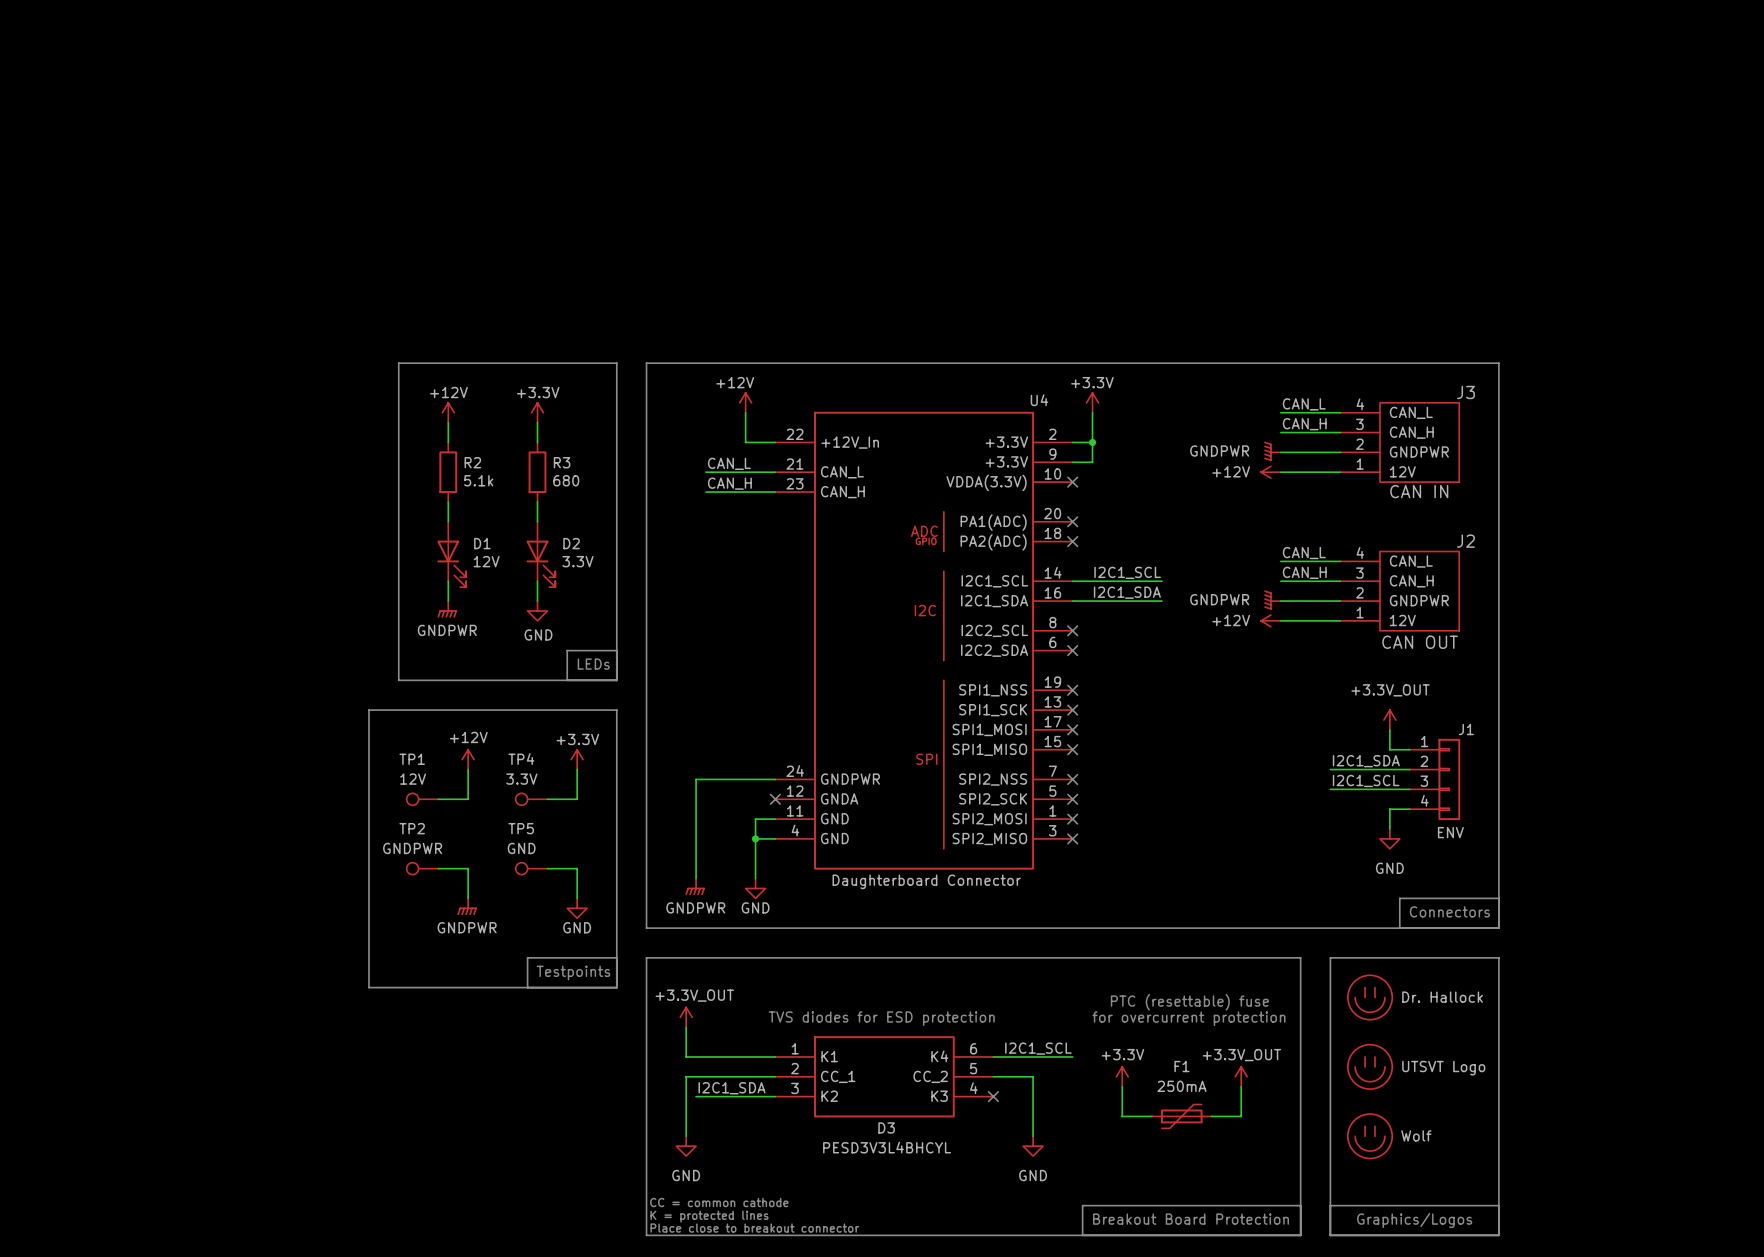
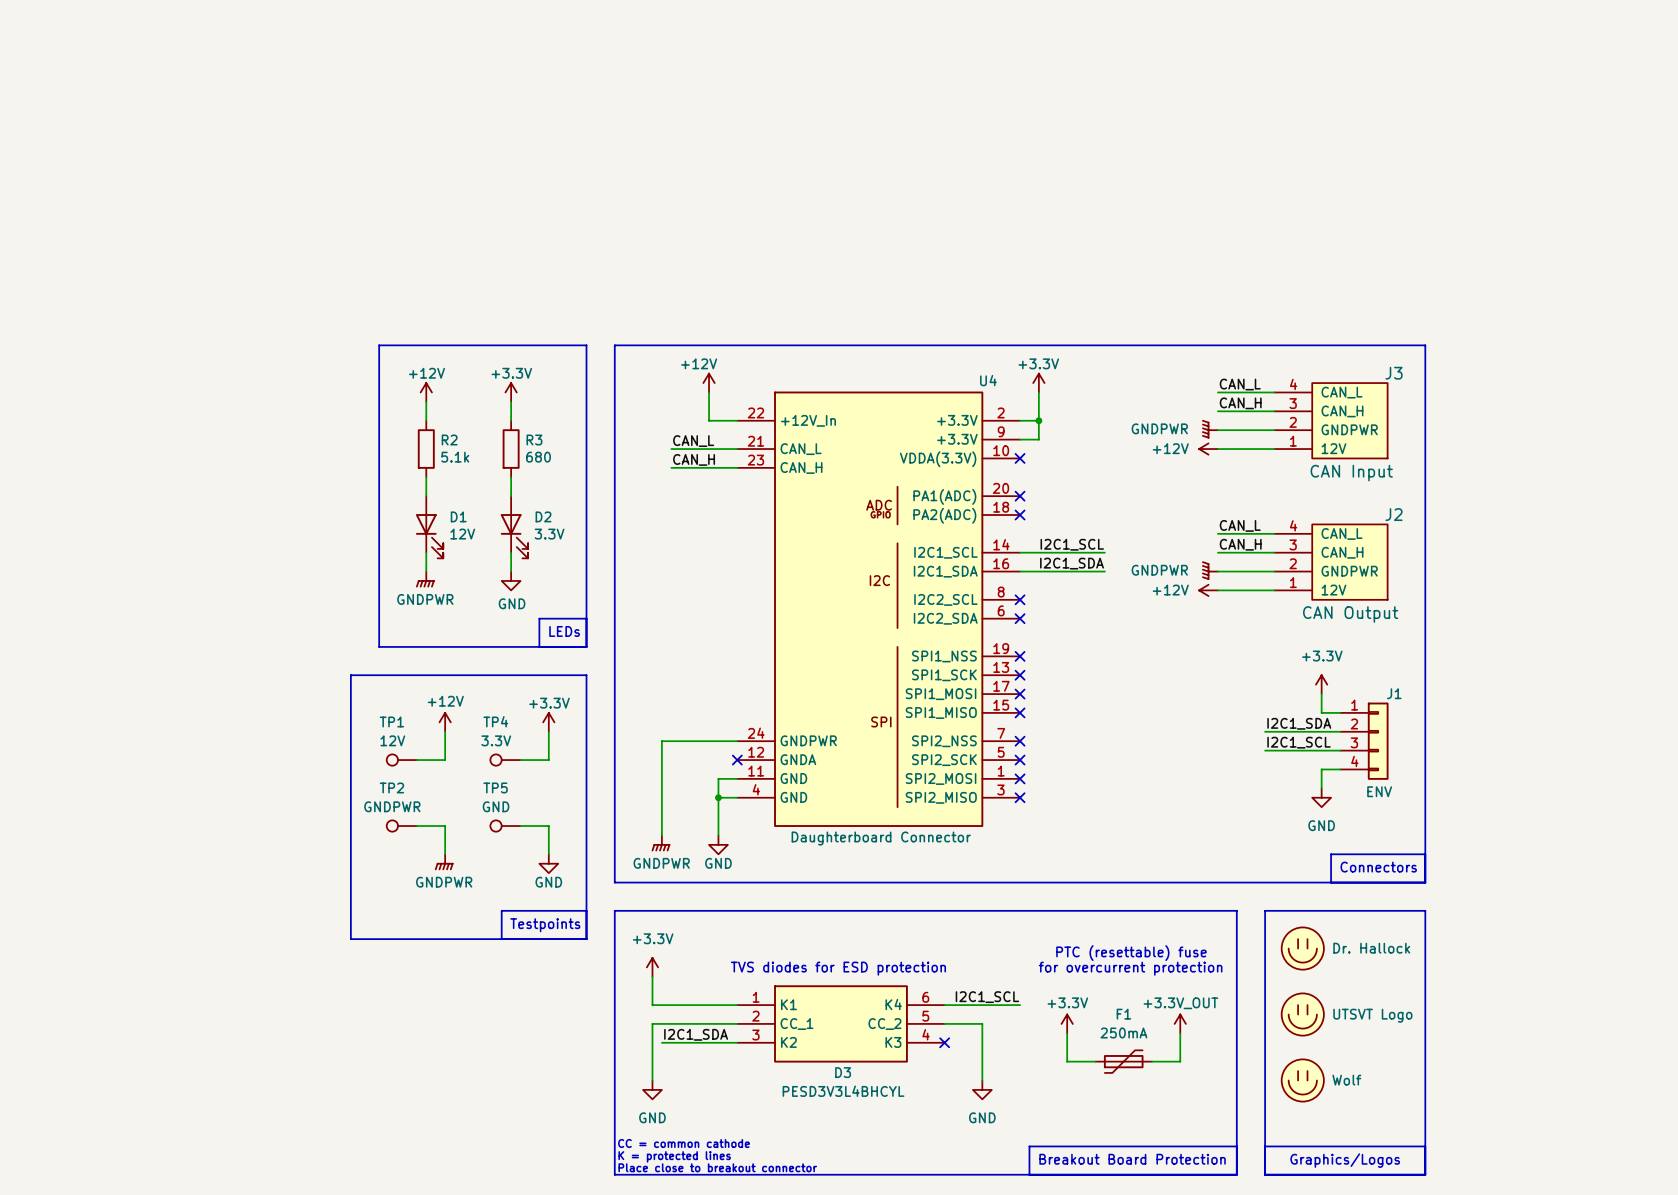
J3 value: CAN IN (1419, 491) -> CAN Input (1351, 473)
J2 value: CAN OUT (1420, 642) -> CAN Output (1350, 614)
power symbol: +3.3V_OUT (1389, 719) -> +3.3V (1321, 684)
power symbol: +3.3V_OUT (686, 1017) -> +3.3V (652, 967)

